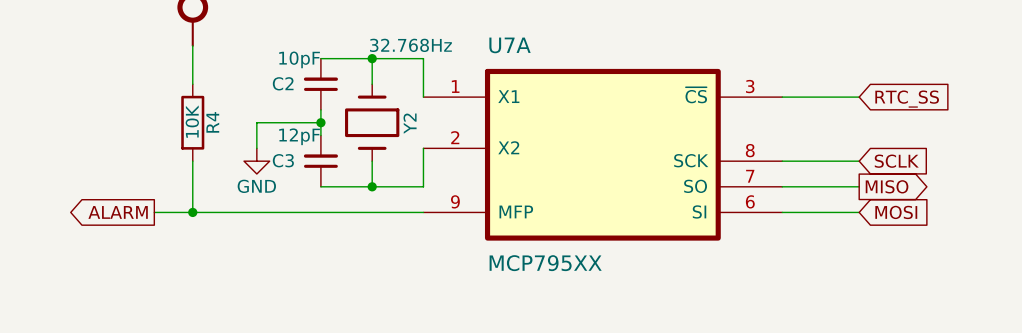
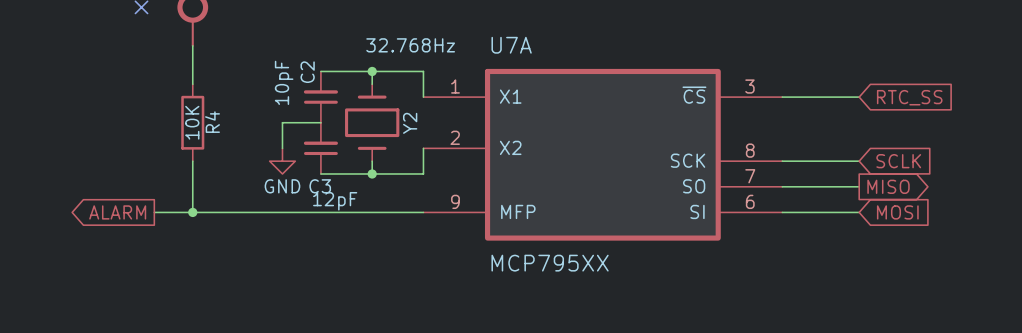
no-connect mark: none -> (141, 7)
wire: (320, 58) (423, 58) (423, 71) -> (320, 71) (423, 71)
wire: (372, 58) (372, 71) -> none
junction position: (372, 58) -> (372, 71)
C2 value rotation: 0° (299, 59) -> 90° counterclockwise (284, 82)
C2 name rotation: 0° (283, 83) -> 90° counterclockwise (307, 72)
C2 position: (320, 84) -> (320, 97)
wire: (282, 122) (256, 122) (256, 148) -> (282, 122) (282, 148)
junction: (320, 122) -> none
C3 value position: 12pF (299, 136) -> 12pF (335, 201)
C3 name position: C3 (283, 160) -> C3 (320, 186)
power symbol position: GND (256, 161) -> GND (282, 161)
C3 position: (320, 161) -> (320, 148)
wire: (372, 173) (372, 186) -> none
wire: (423, 173) (423, 186) (320, 186) -> (423, 173) (320, 173)
junction position: (372, 186) -> (372, 173)

